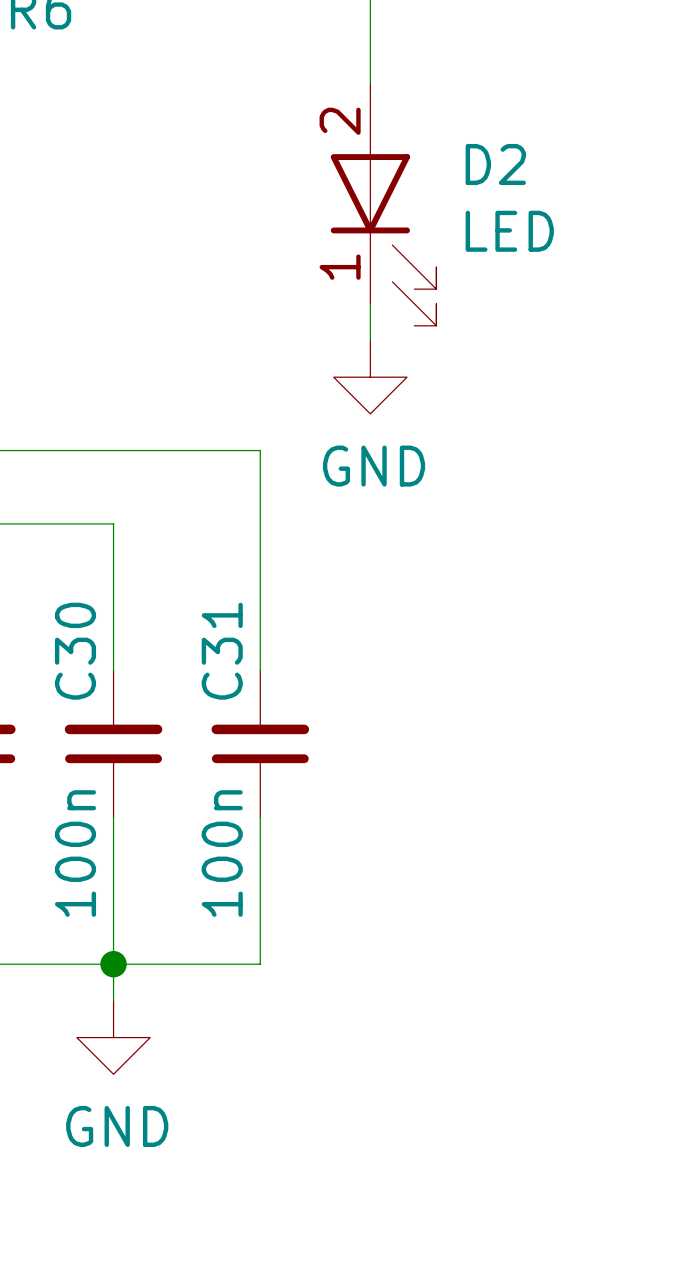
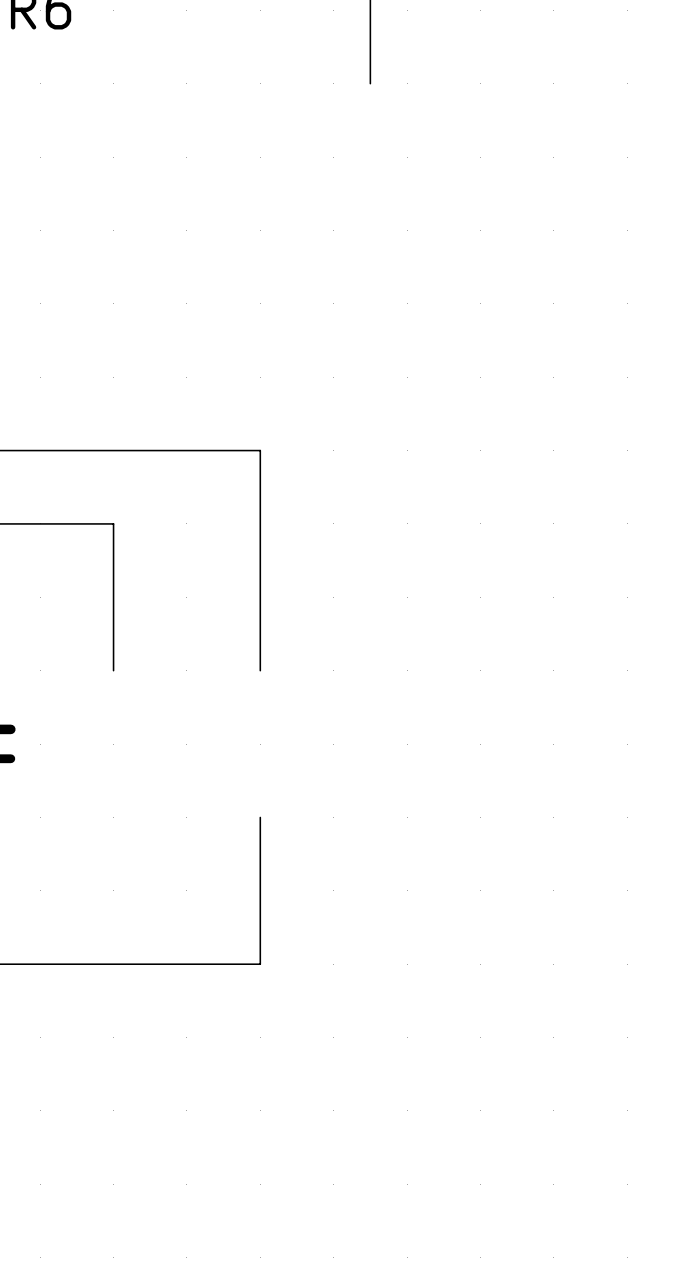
D2: LED (383, 204) -> none
wire: (370, 303) (370, 340) -> none
power symbol: GND (370, 377) -> none
C30: 100n (113, 744) -> none
C31: 100n (260, 744) -> none
wire: (113, 817) (113, 1000) -> none
junction: (113, 964) -> none
power symbol: GND (113, 1037) -> none

